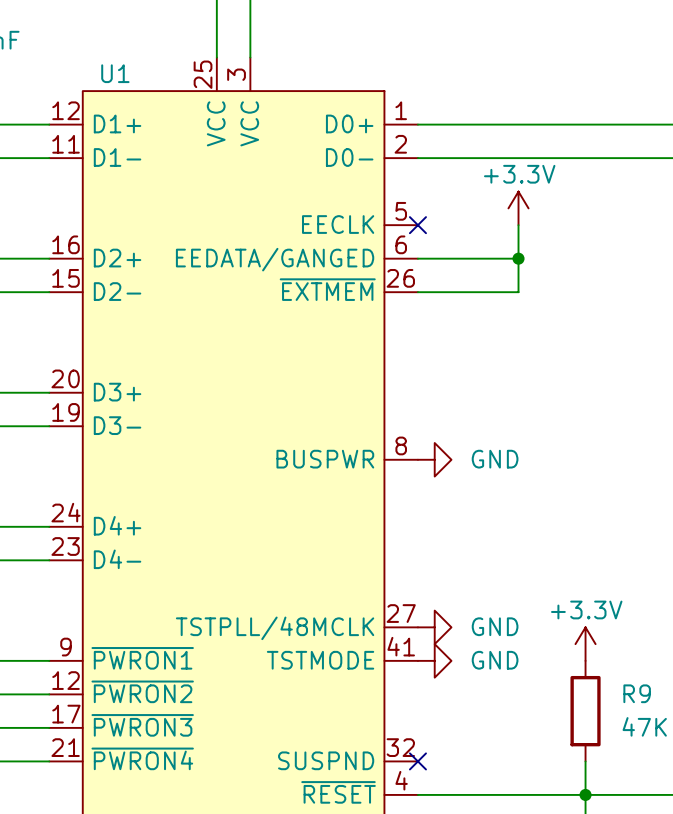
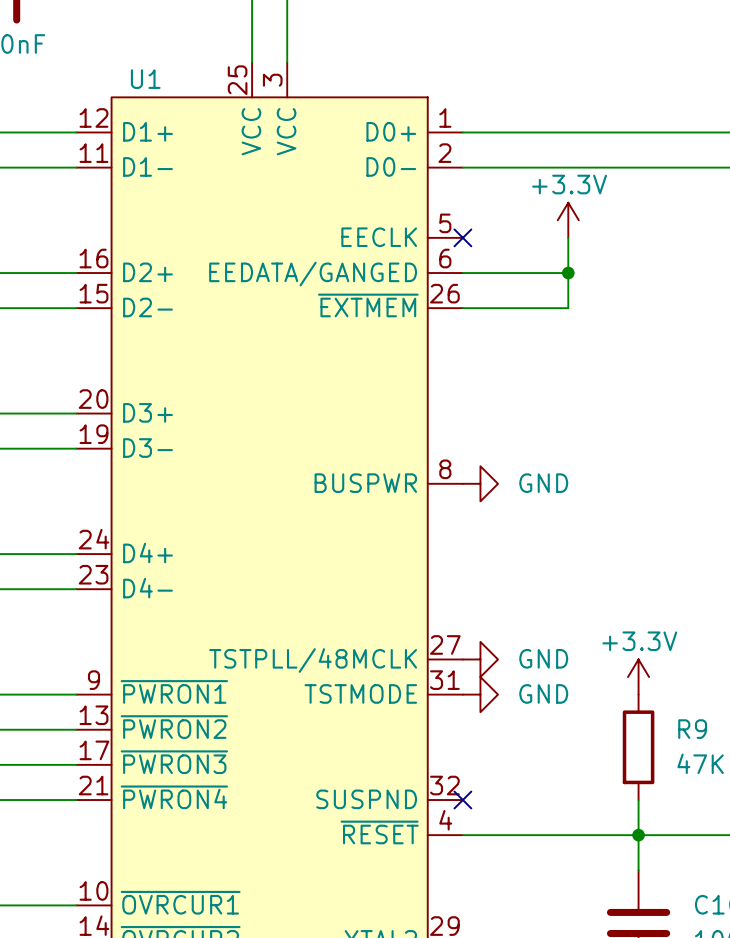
U1 pin number: 41 (401, 646) -> 31 (444, 680)
U1 pin number: 12 (66, 680) -> 13 (93, 715)

